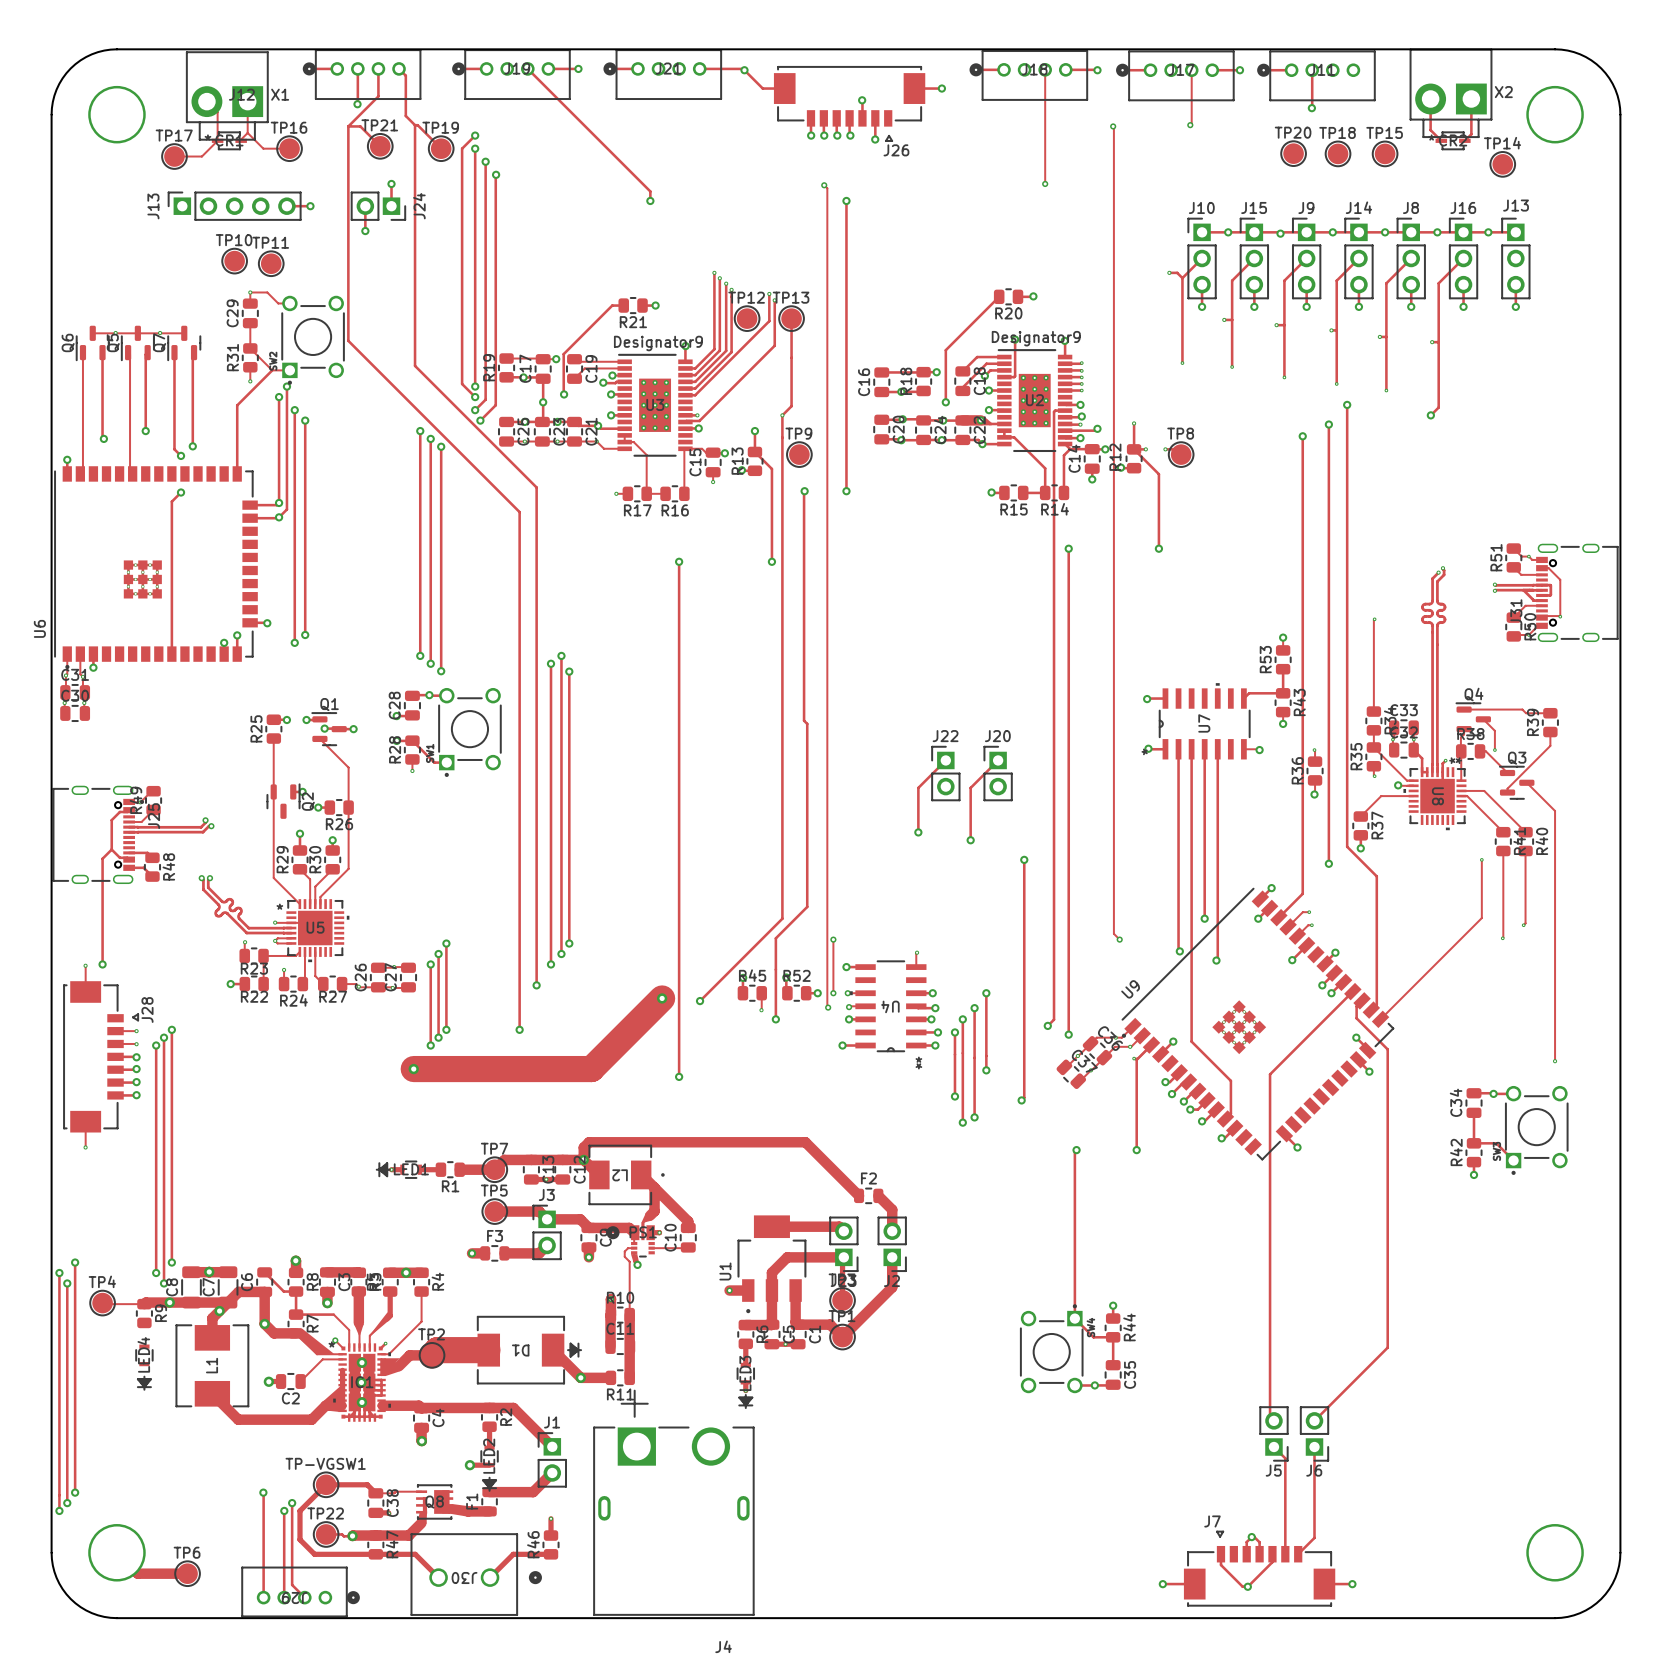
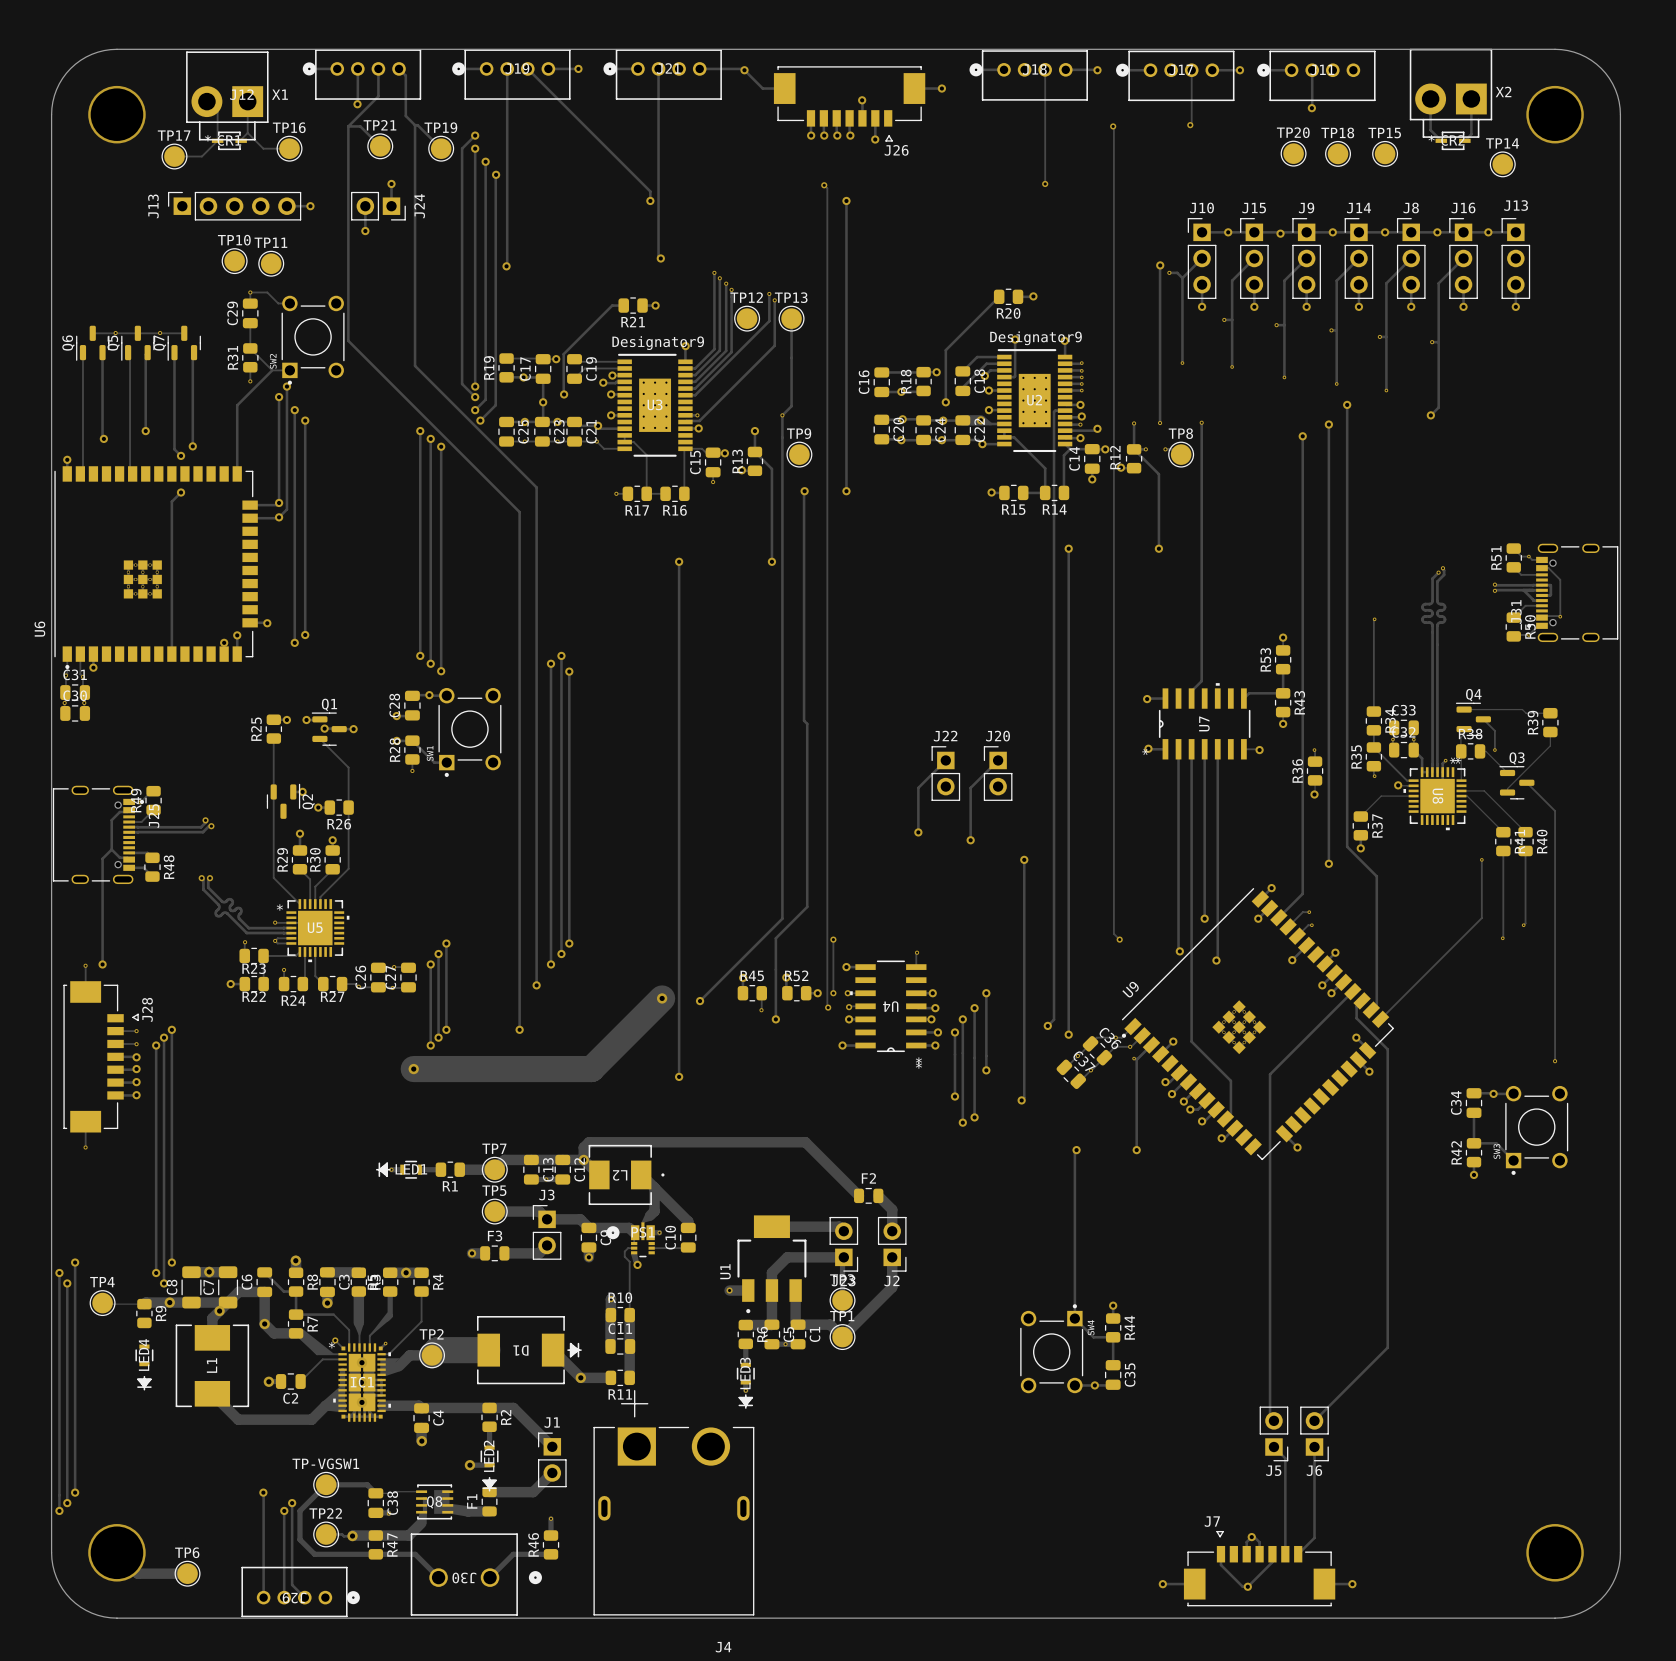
track: none -> (507, 68) (506, 266)
track: none -> (658, 68) (658, 256) (660, 258)
via: none -> (660, 258)
track: none -> (1160, 265) (1160, 423)
via: none -> (1160, 265)
via: none -> (506, 266)
track: none -> (1201, 422) (1201, 681) (1191, 691) (1191, 698)
via: none -> (1201, 422)
via: none -> (1160, 423)

